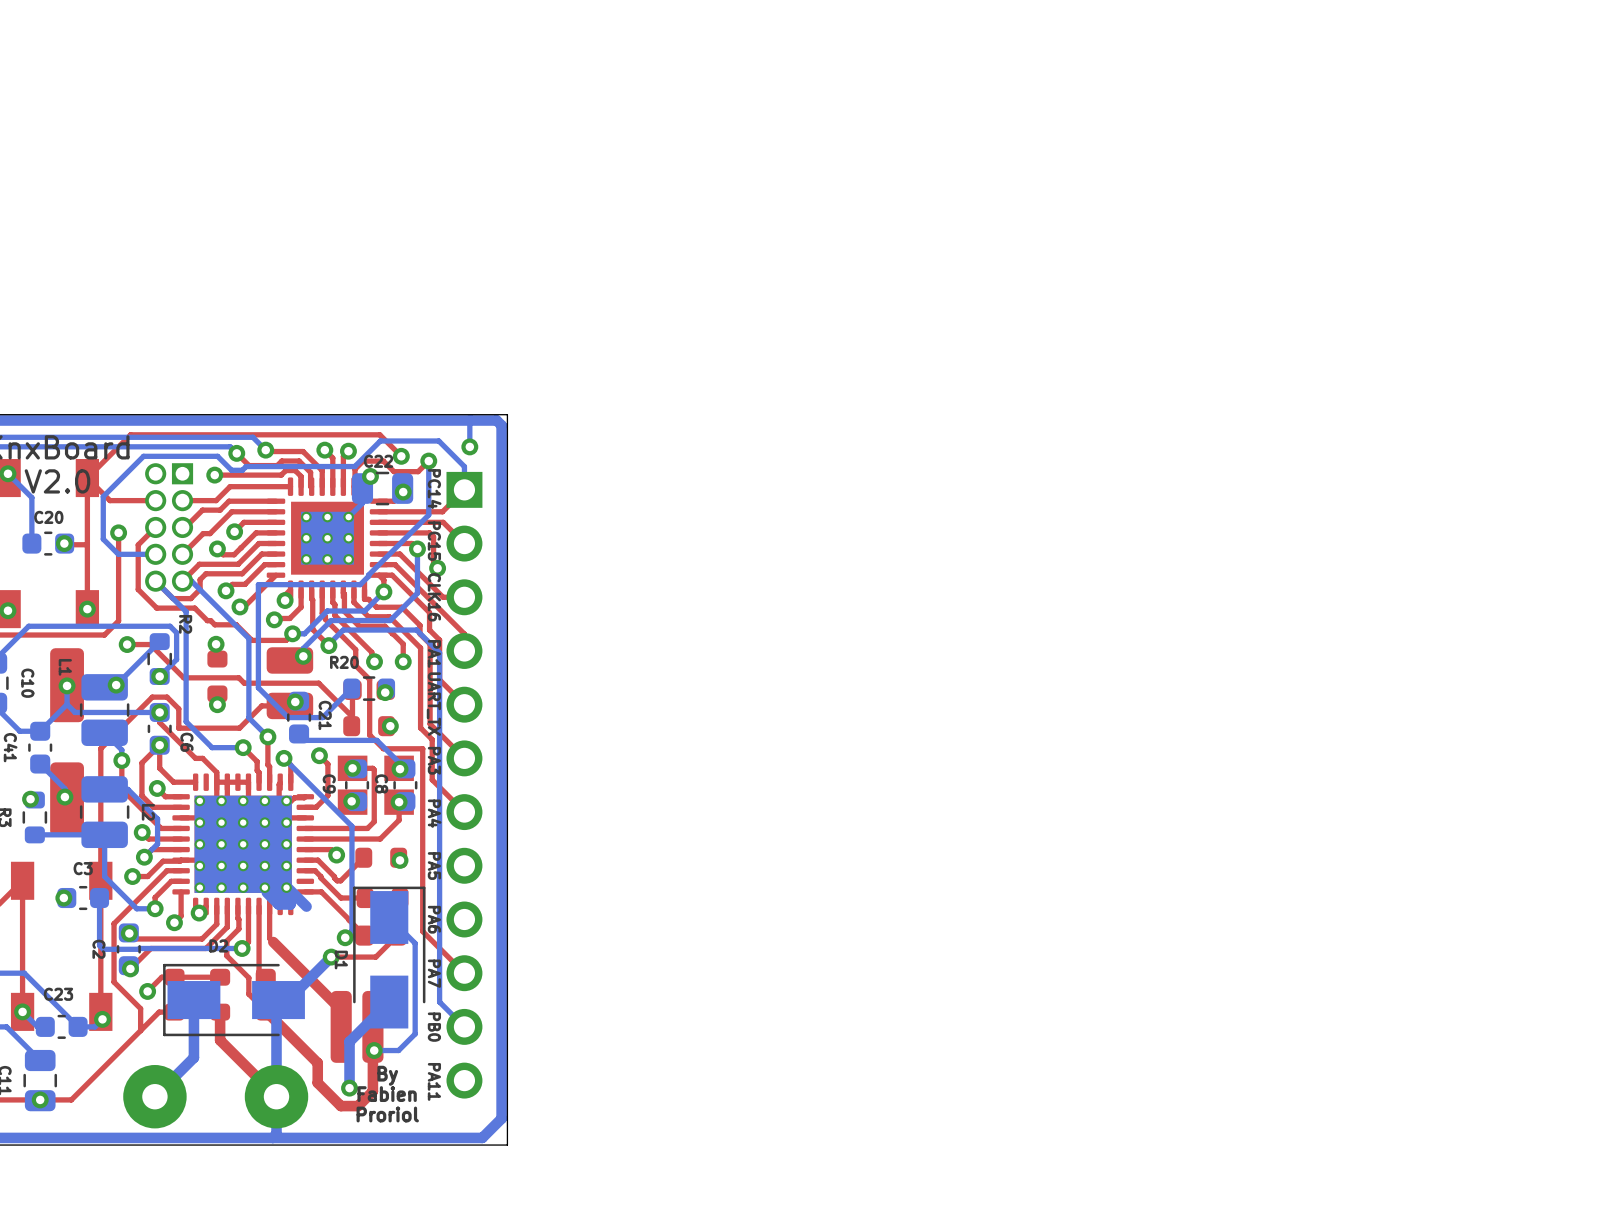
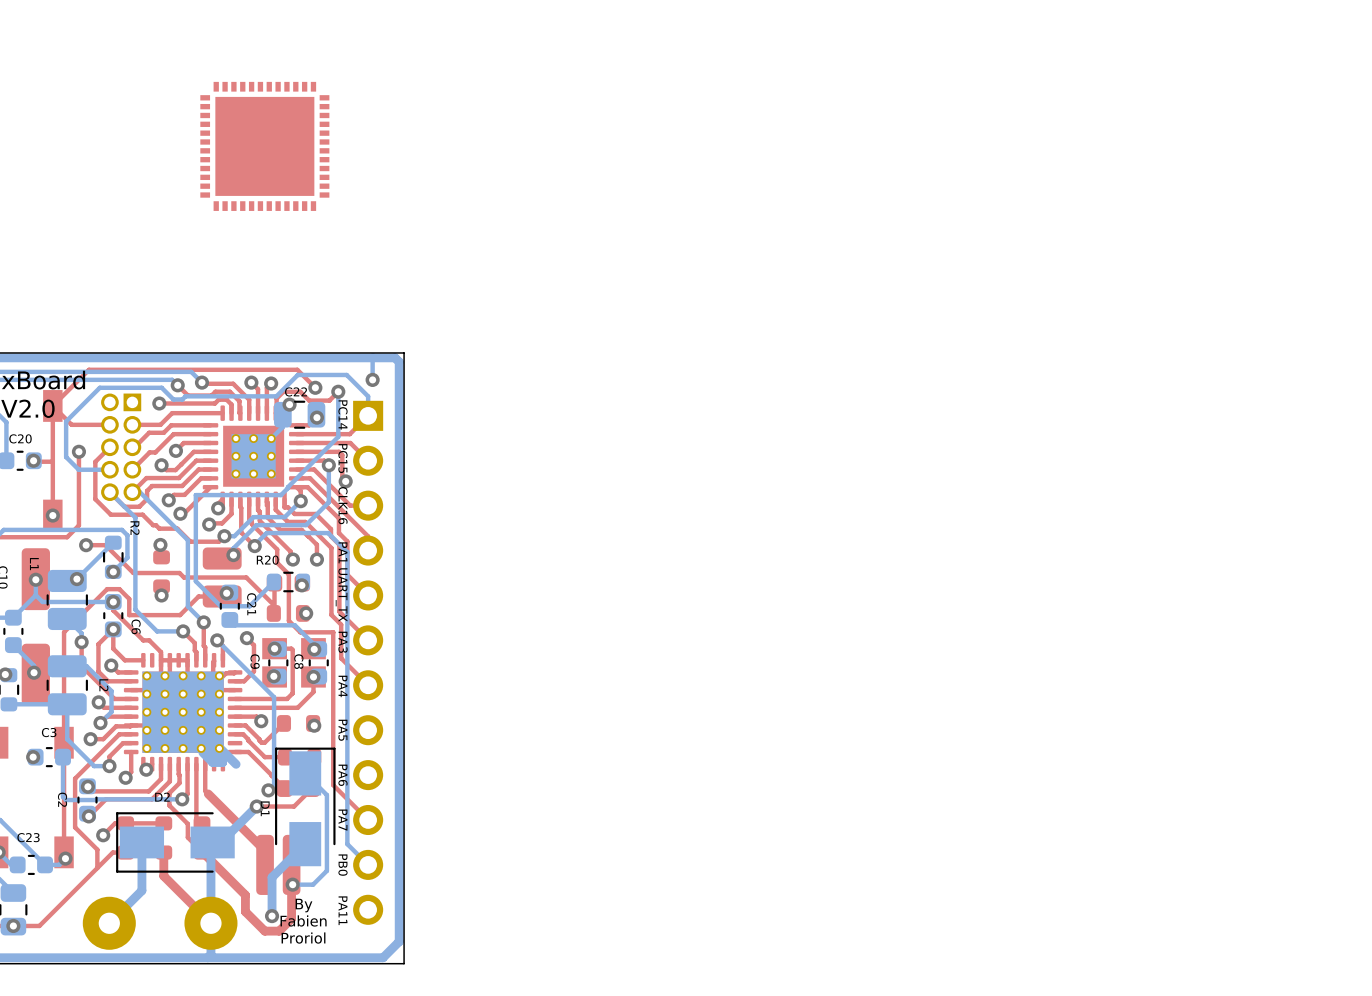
part: none -> (264, 146)

